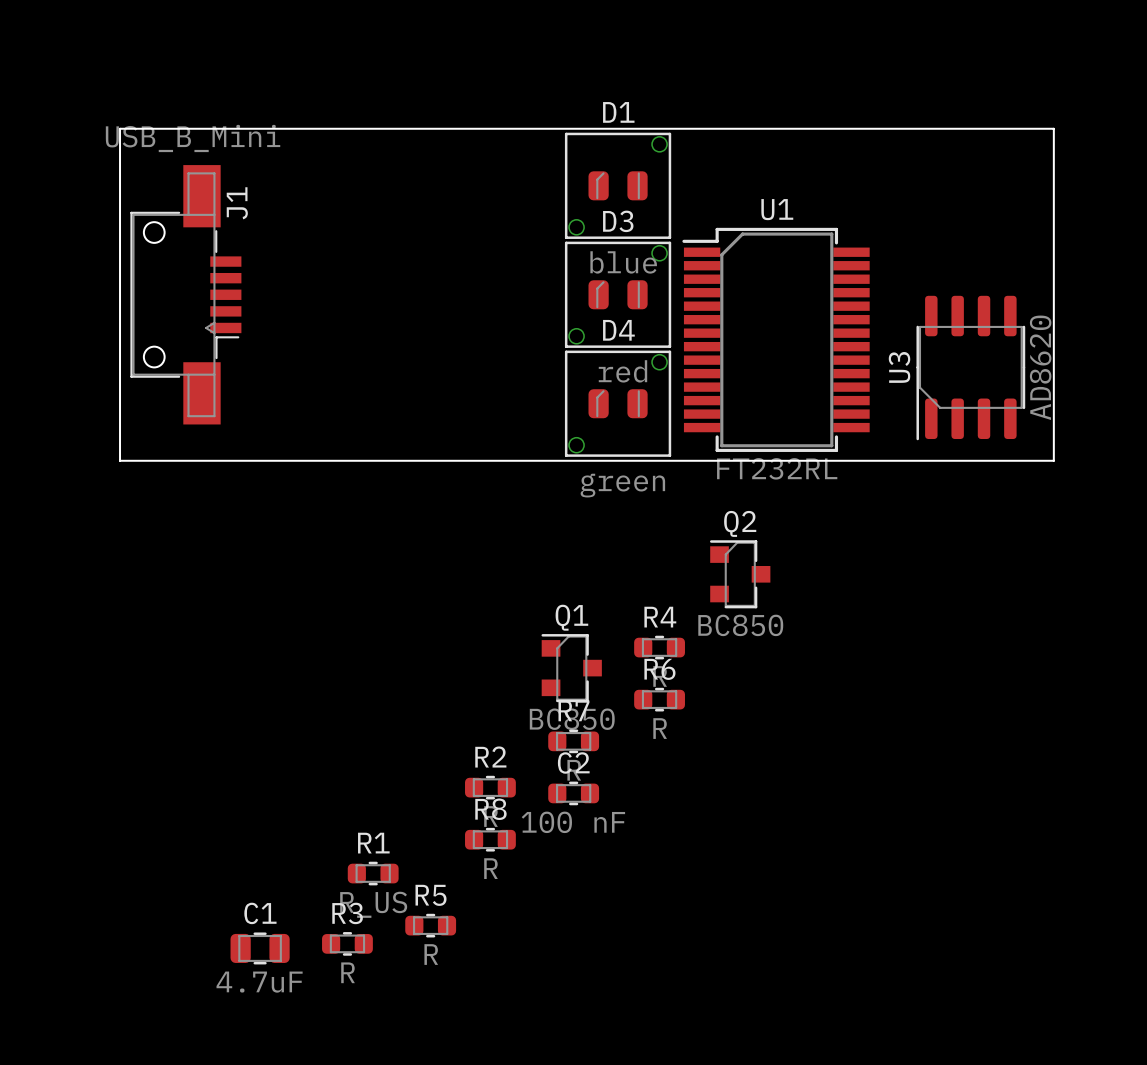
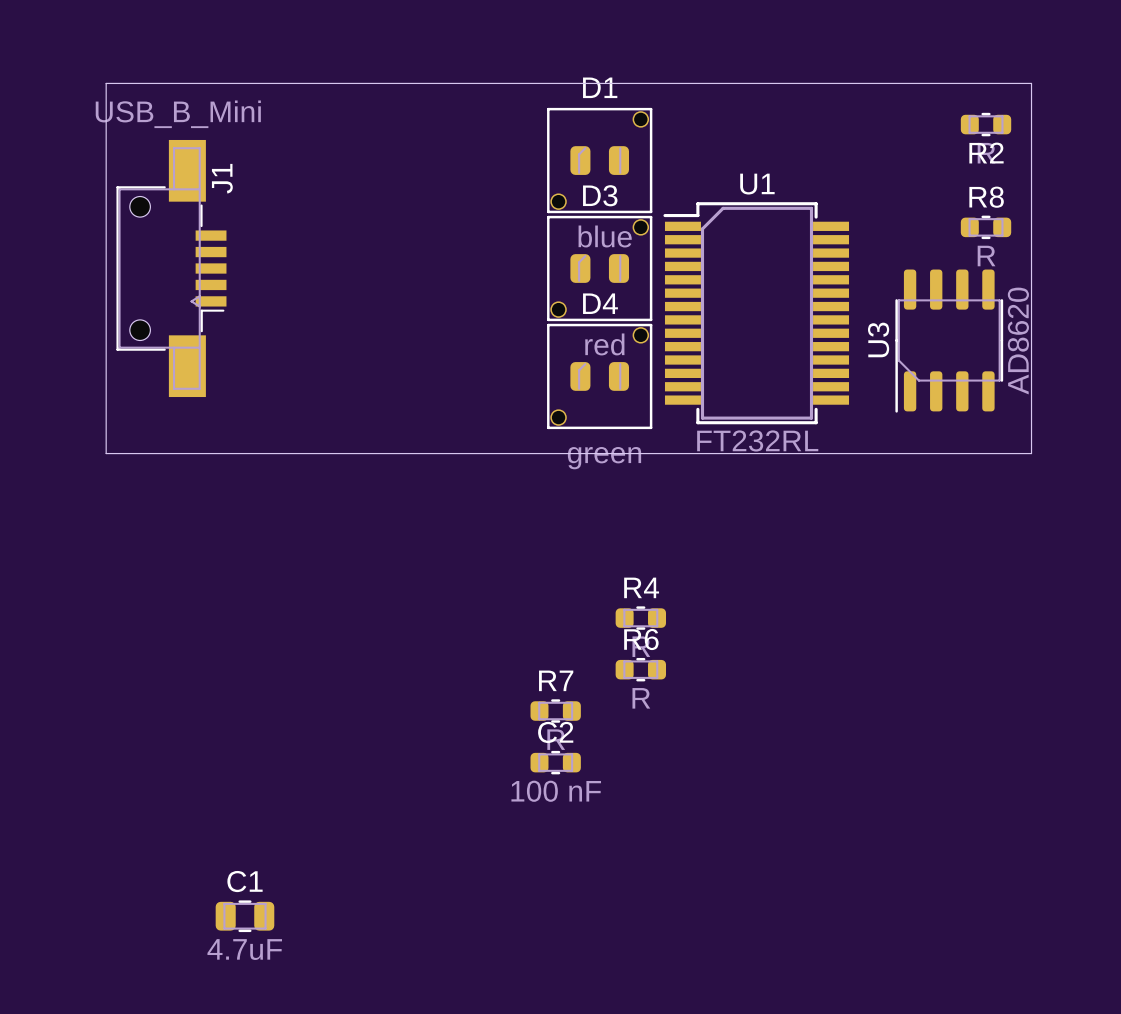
board edge: (120, 128) (1053, 128) -> (106, 103) (106, 83) (1031, 83) (1031, 103)
board edge: (120, 460) (1053, 460) -> (106, 433) (106, 453) (1031, 453) (1031, 433)
Q2: BC850 (740, 574) -> none
Q1: BC850 (571, 668) -> none
R2 name position: R2 (490, 757) -> R2 (986, 153)
R2 position: (490, 787) -> (986, 124)
R8 position: (490, 839) -> (986, 227)
R1: R_US (373, 873) -> none
R5: R (430, 925) -> none
R3: R (347, 943) -> none

